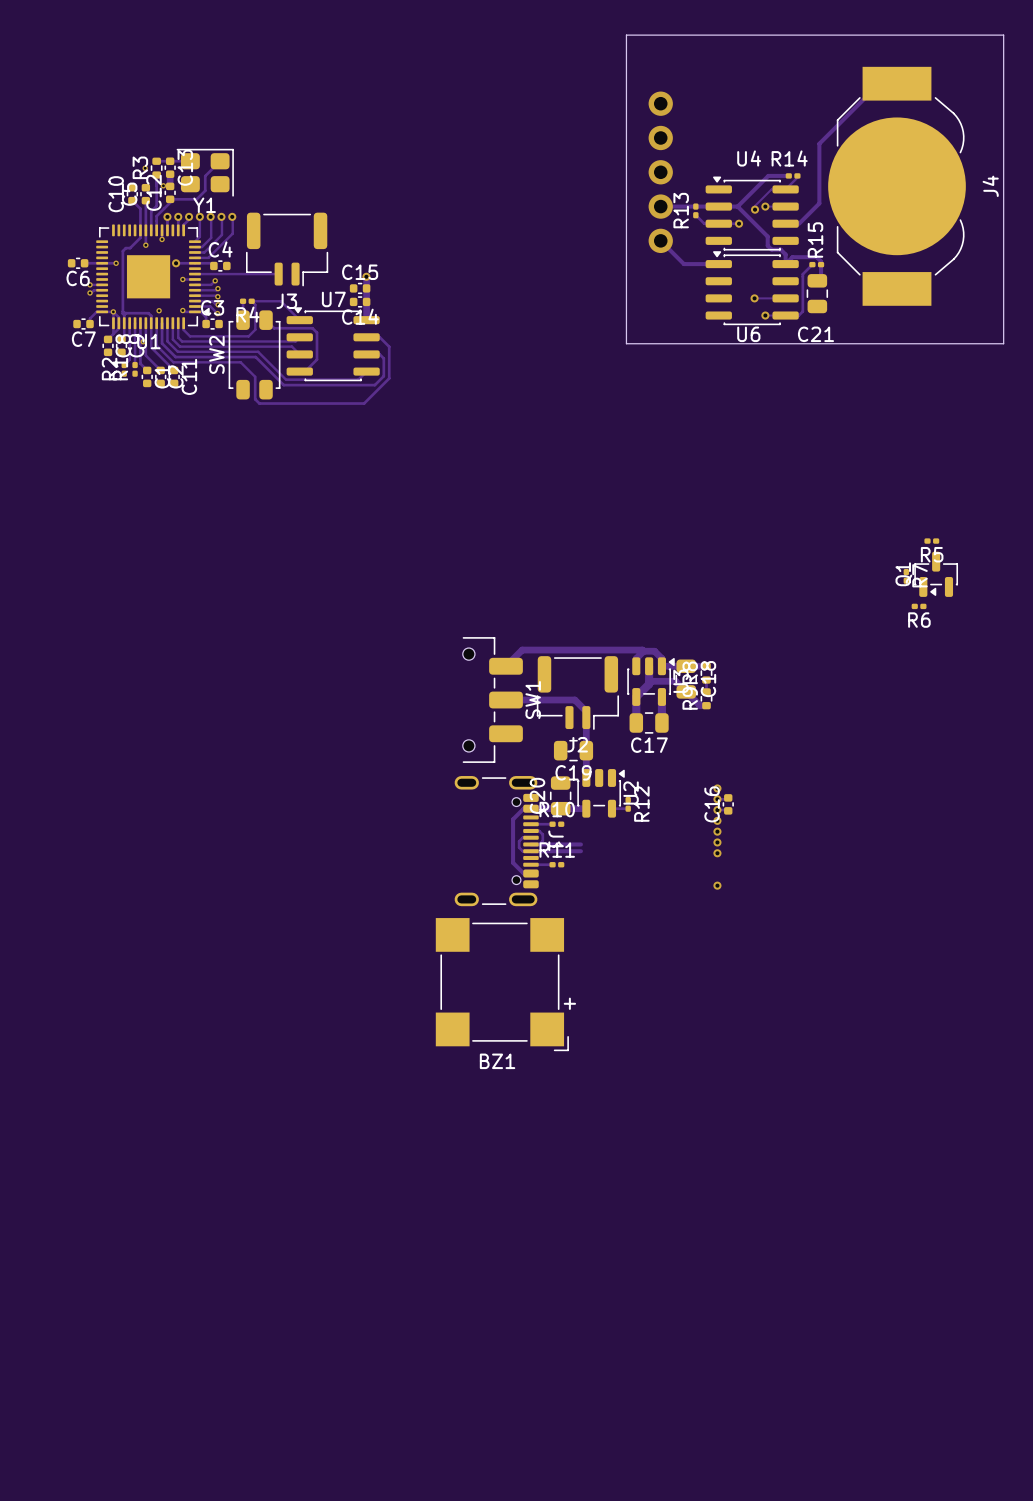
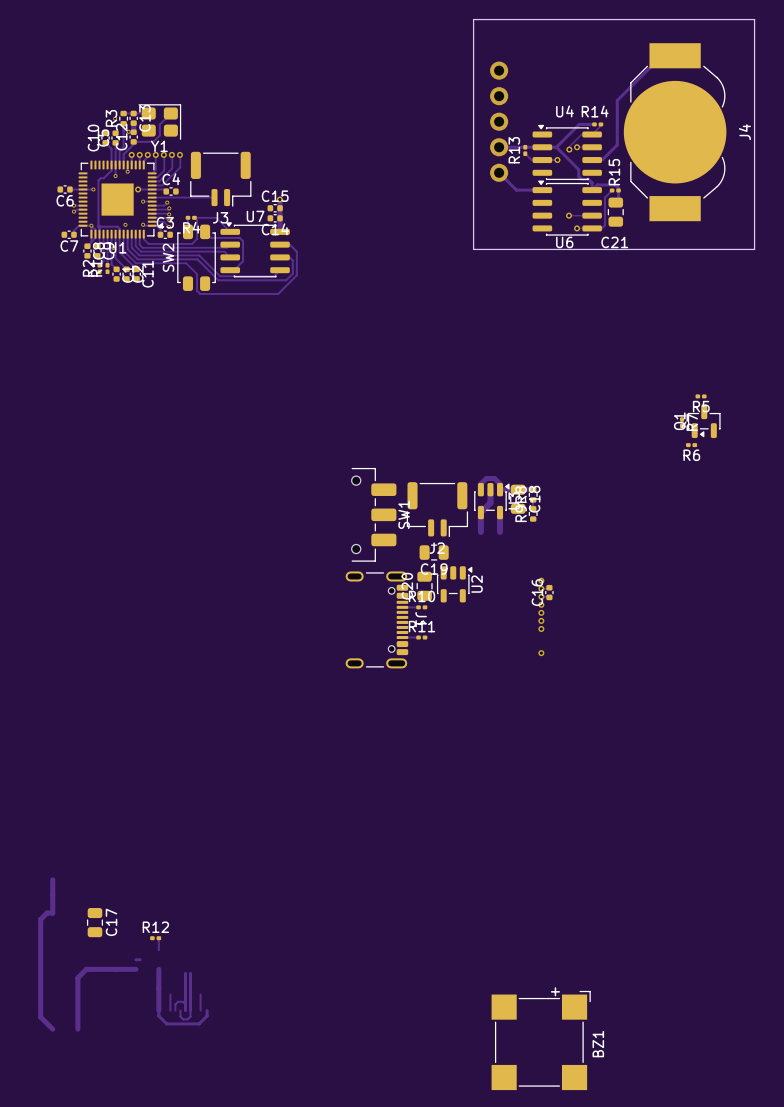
track: (643, 651) (522, 650) (506, 666) -> none
track: (649, 684) (651, 681) (675, 681) (700, 705) (706, 705) -> none
track: (506, 700) (574, 700) (586, 711) (586, 777) -> none
C17 rotation: 0° (649, 722) -> 90° clockwise (94, 922)
C17 position: (649, 722) -> (94, 922)
C17 name position: C17 (649, 745) -> C17 (111, 922)
R12 rotation: 0° (628, 804) -> 90° clockwise (155, 938)
R12 position: (628, 804) -> (155, 938)
track: (586, 808) (523, 808) (513, 819) (513, 862) (523, 873) (530, 873) -> none
track: (611, 808) (628, 808) -> none
track: (530, 830) (539, 830) (542, 834) (542, 840) (539, 844) (530, 844) (580, 844) -> none
track: (530, 837) (522, 837) (519, 841) (519, 847) (522, 851) (580, 851) -> none
BZ1 rotation: 0° (502, 984) -> 90° counterclockwise (541, 1040)
BZ1 position: (502, 984) -> (541, 1040)
track: none -> (52, 879) (52, 913) (47, 913) (40, 919) (40, 1017) (52, 1029)
track: none -> (158, 938) (158, 950)
track: none -> (135, 959) (140, 959)
track: none -> (135, 969) (86, 969) (77, 977) (77, 1029)
track: none -> (158, 969) (158, 1016) (166, 1023) (199, 1023) (207, 1016) (207, 1010)
track: none -> (185, 973) (185, 1010) (185, 1004) (182, 1001) (178, 1001) (175, 1004) (175, 1010)
track: none -> (190, 973) (190, 1016) (187, 1019) (183, 1019) (180, 1016) (180, 1010)
track: none -> (170, 994) (170, 1010)
track: none -> (200, 994) (200, 1010)

